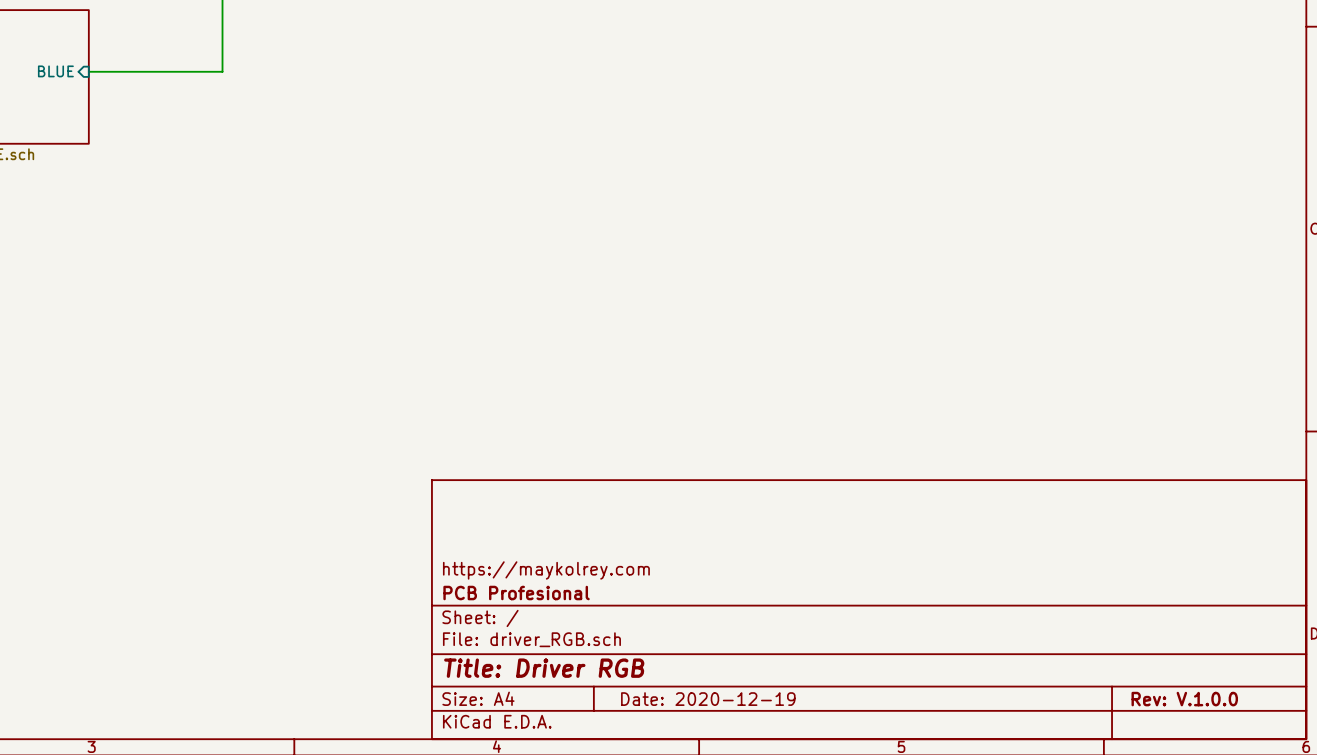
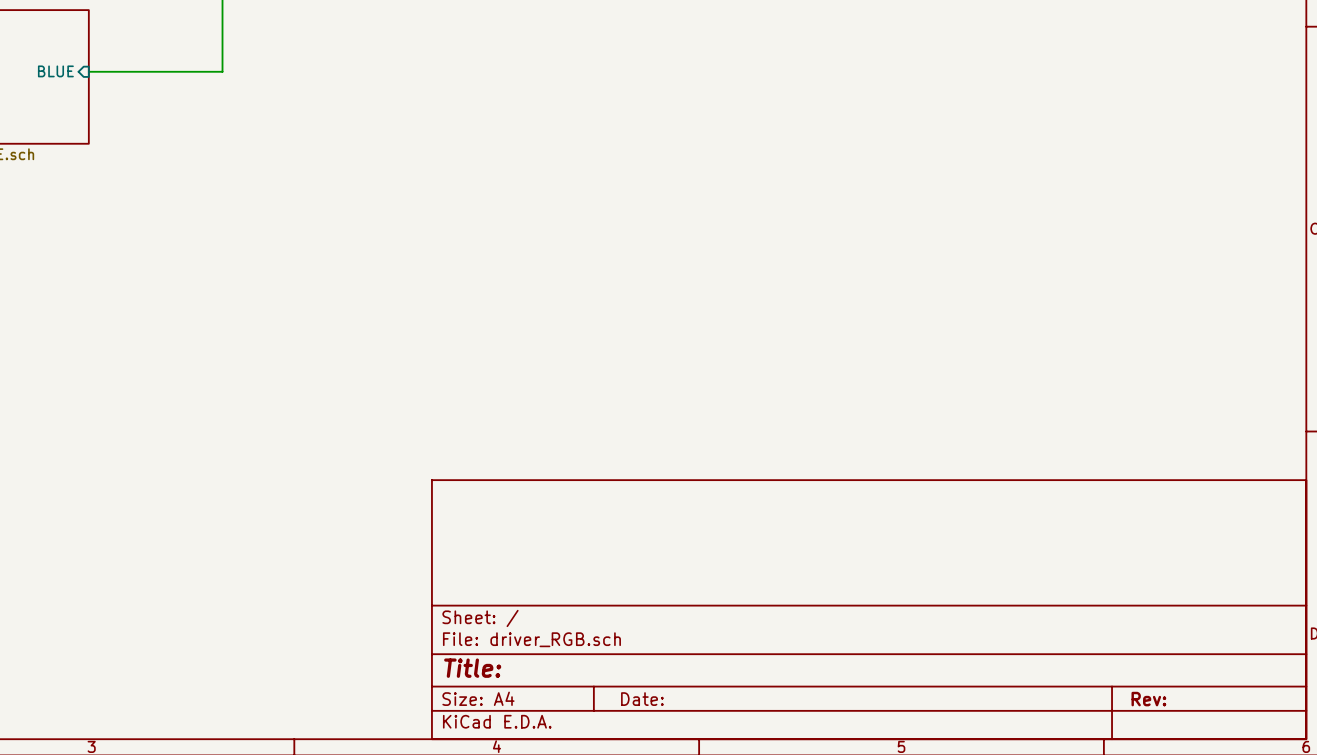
title block: https://maykolrey.com (546, 570) -> none
title block: PCB Profesional (516, 593) -> none
title block: Title: Driver RGB (544, 668) -> Title: (472, 668)
title block: Date: 2020-12-19 (708, 699) -> Date: (642, 699)
title block: Rev: V.1.0.0 (1184, 699) -> Rev: (1148, 699)

